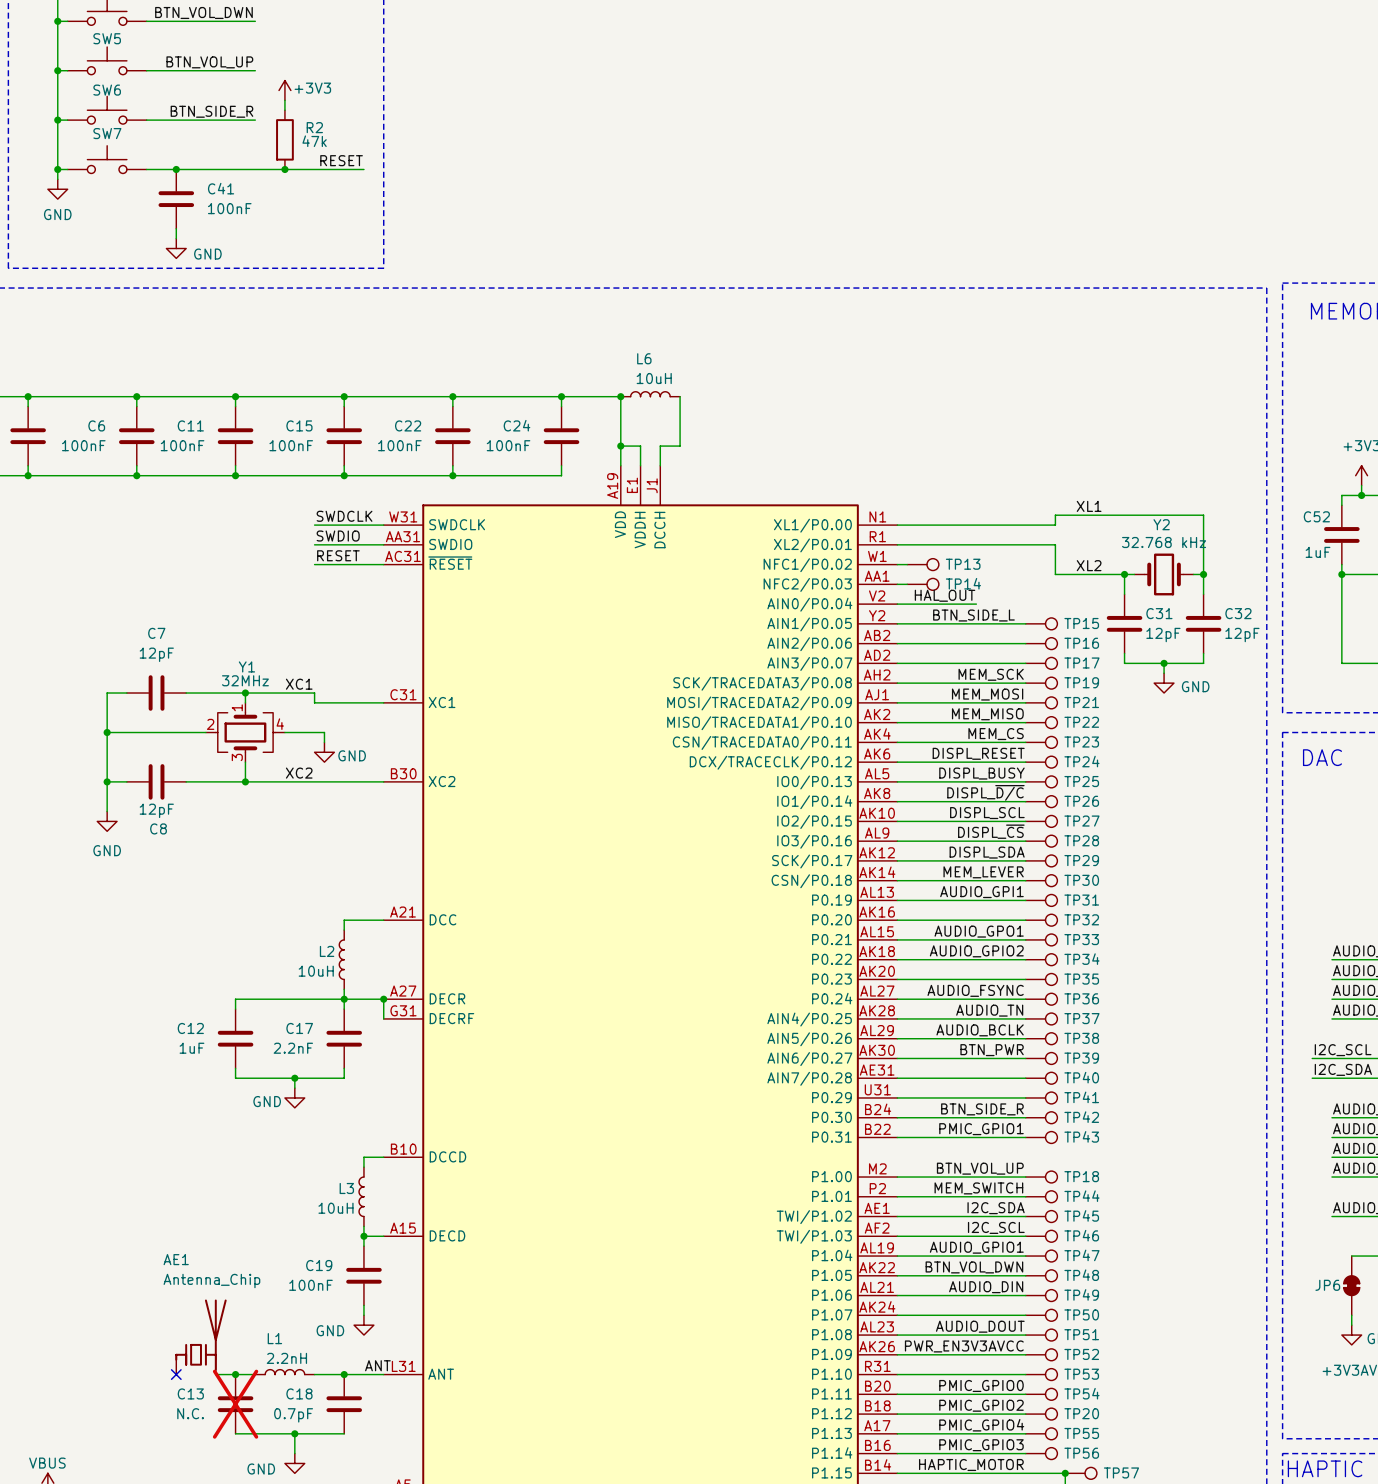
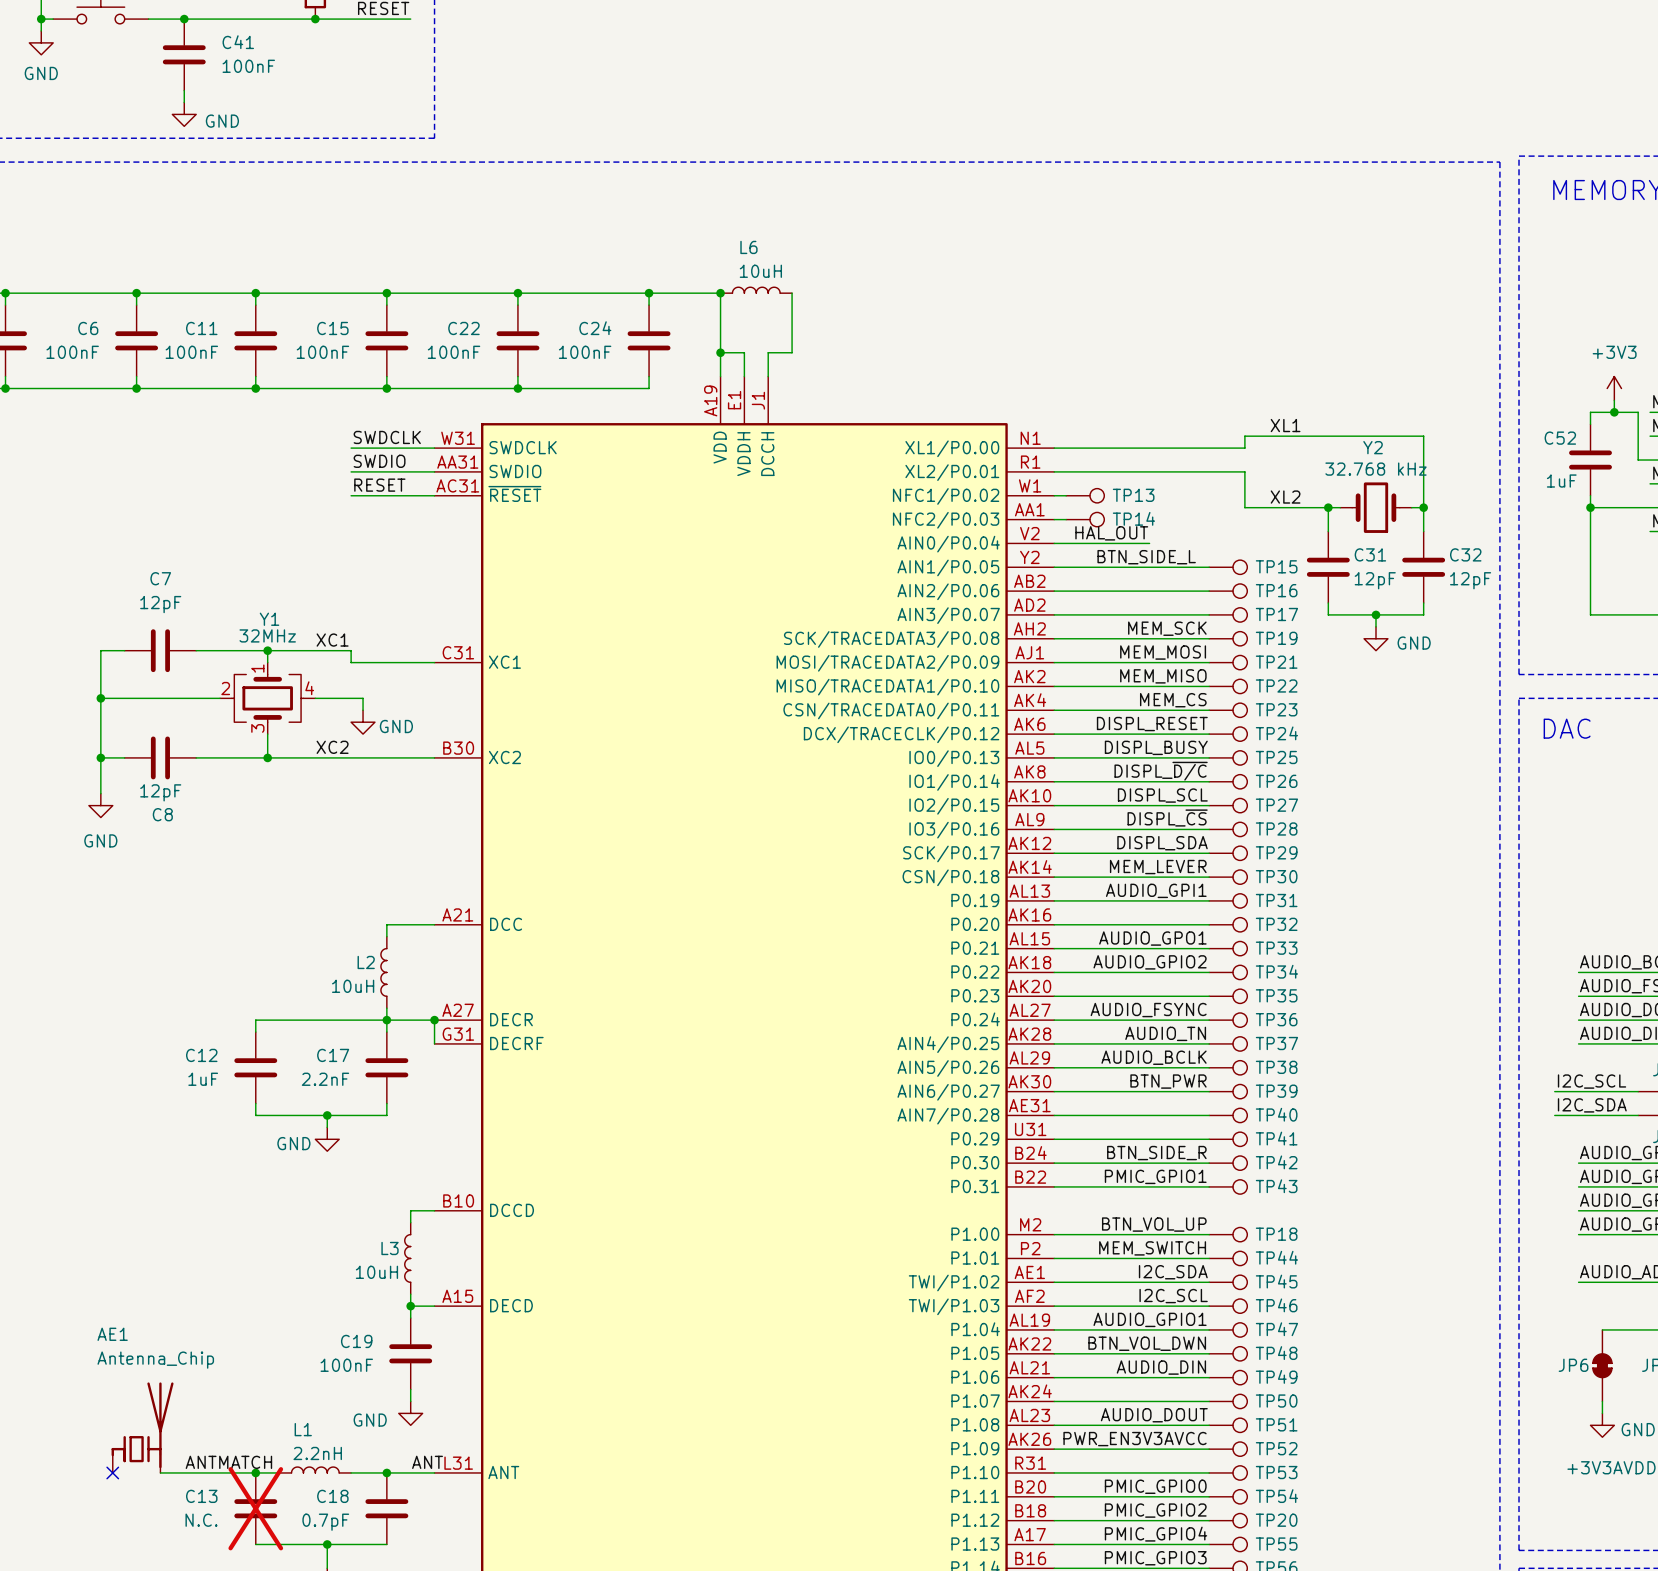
AE1 position: (200, 1337) -> (142, 1427)
label: none -> ANTMATCH (228, 1462)
no-connect mark: none -> (112, 1472)
wire: none -> (160, 1472) (231, 1472)
no-connect mark: (176, 1374) -> none

